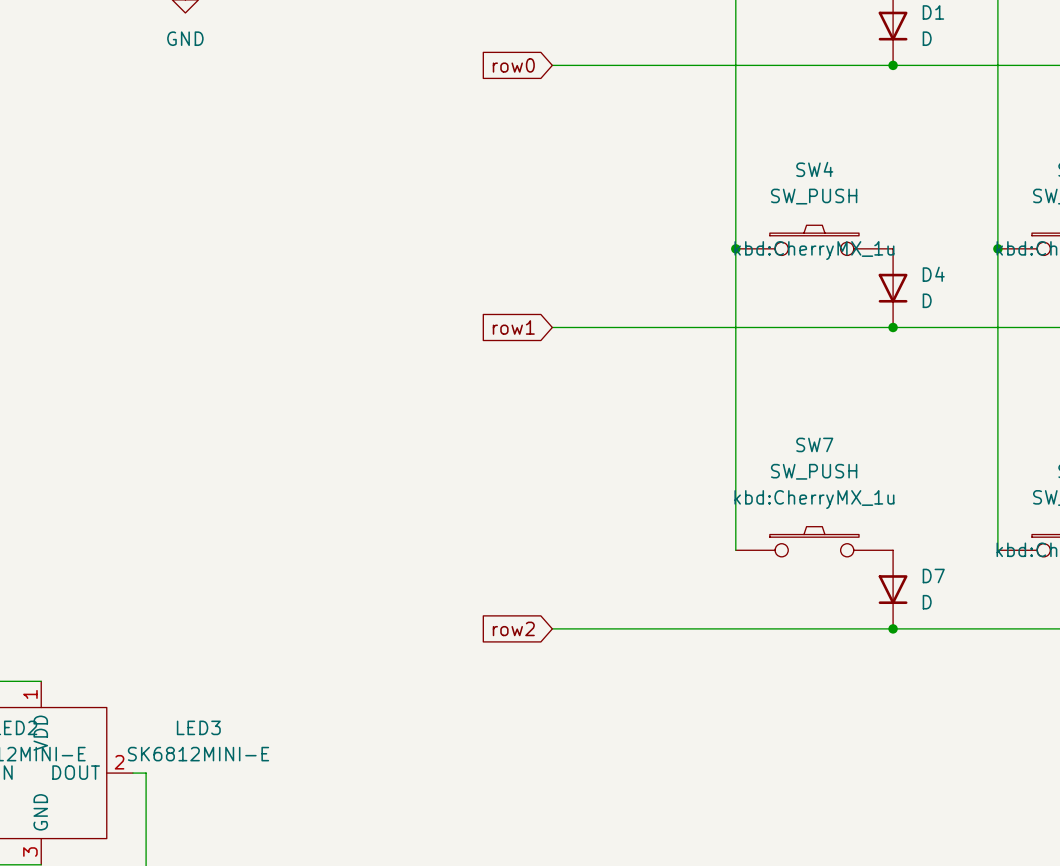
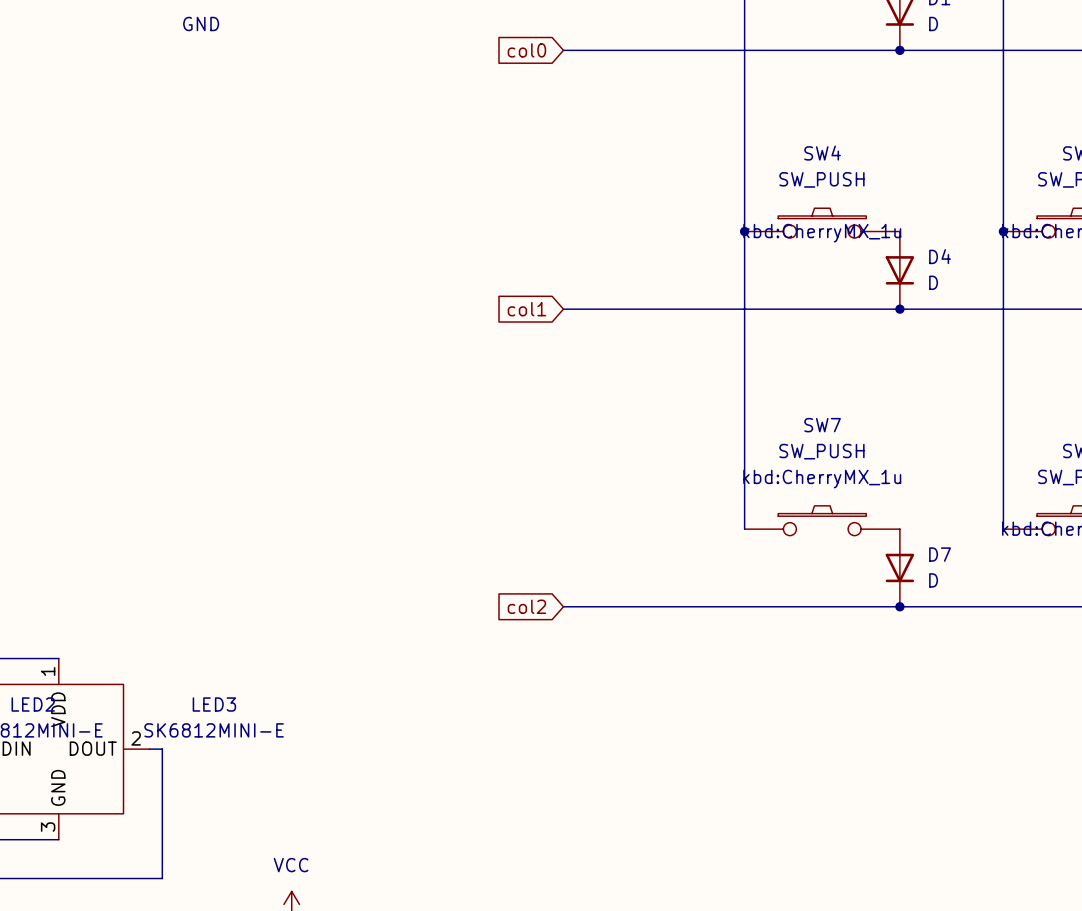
global label: row0 (513, 65) -> col0 (526, 50)
global label: row1 (513, 327) -> col1 (526, 309)
global label: row2 (513, 628) -> col2 (526, 606)

